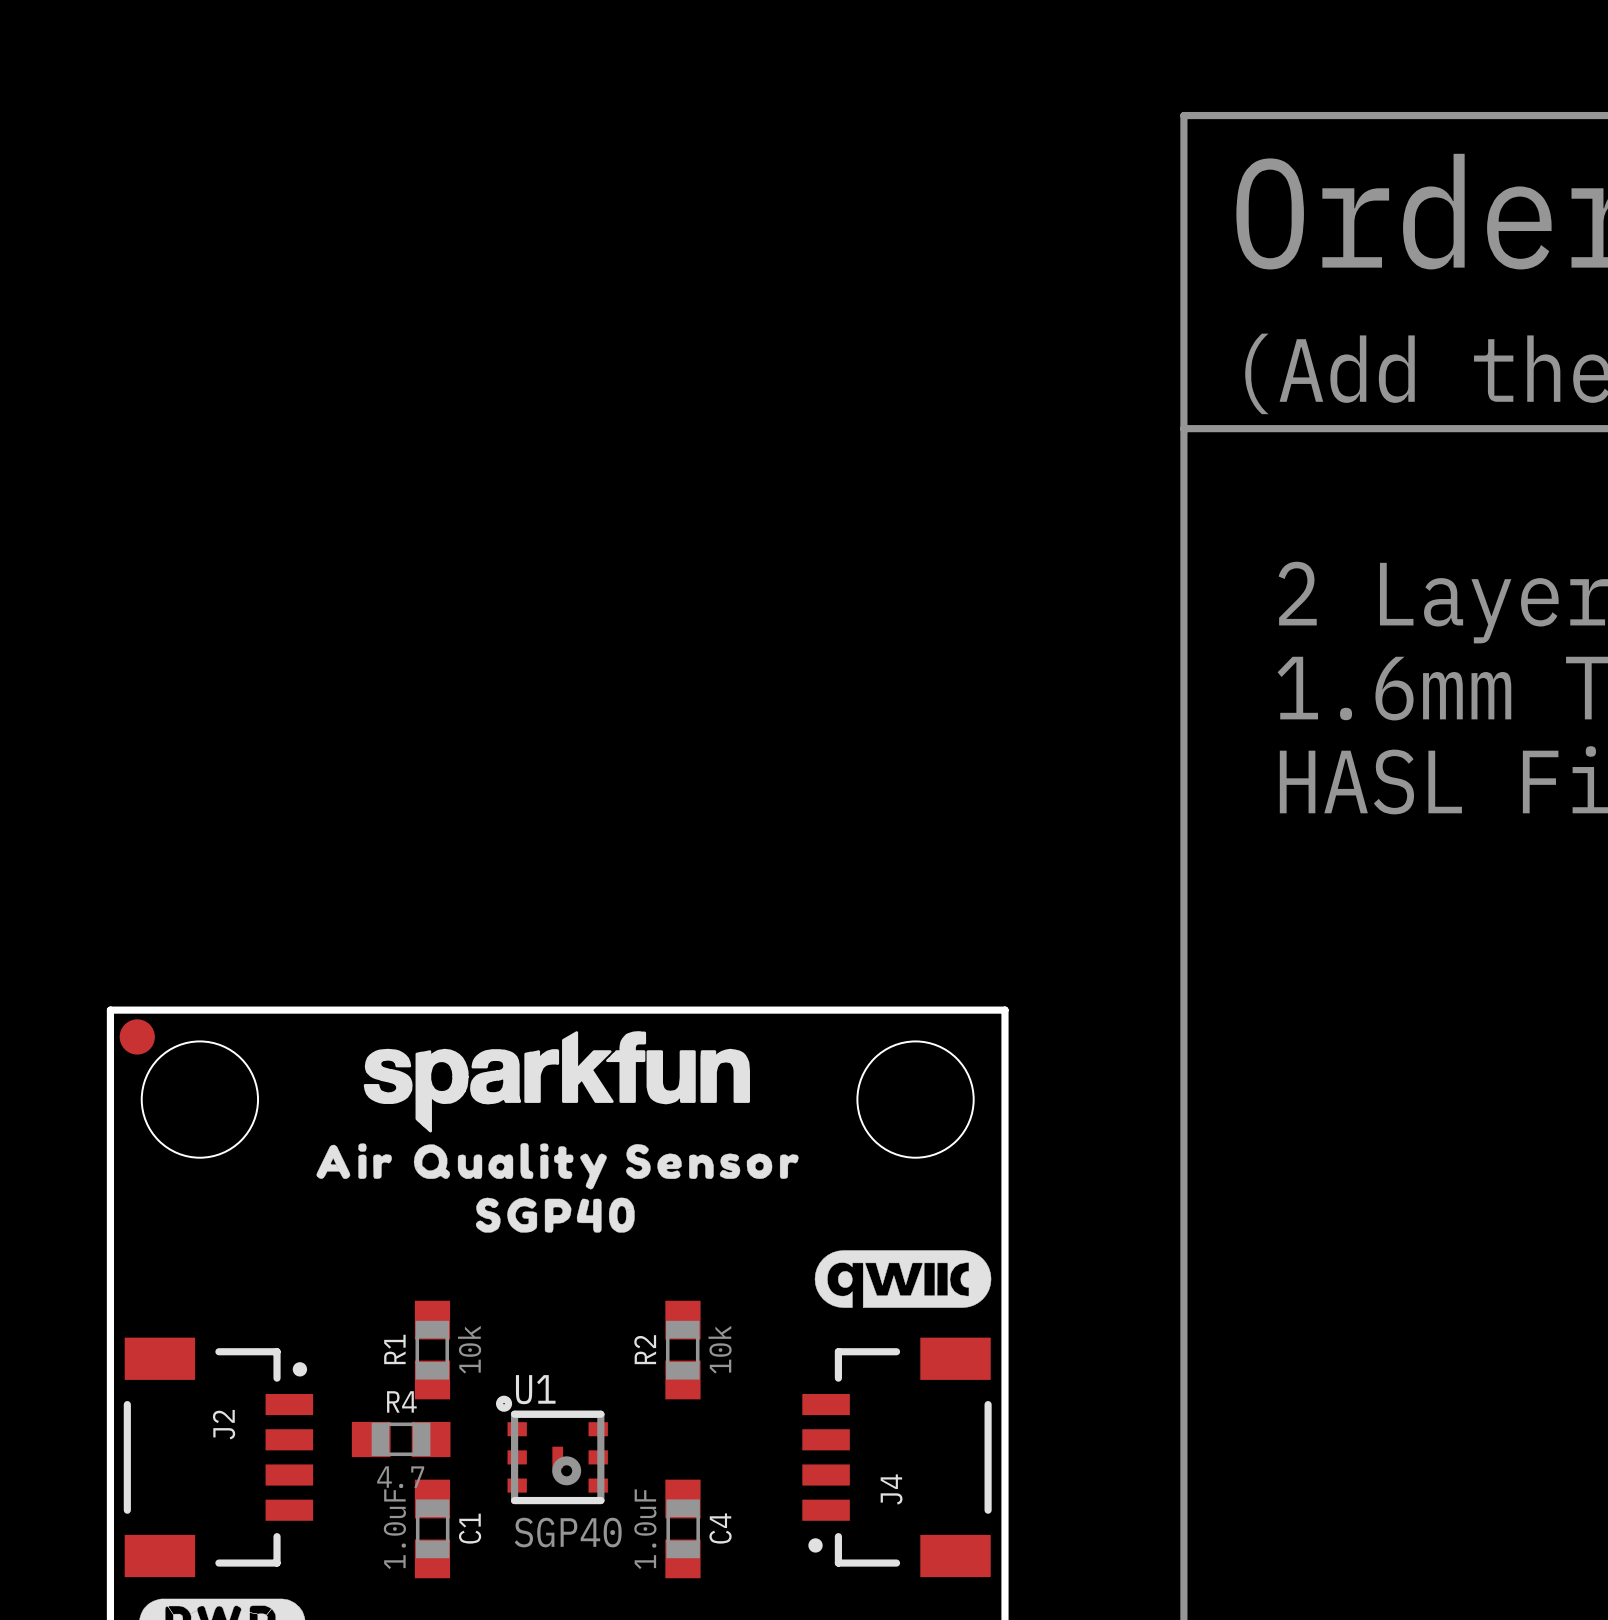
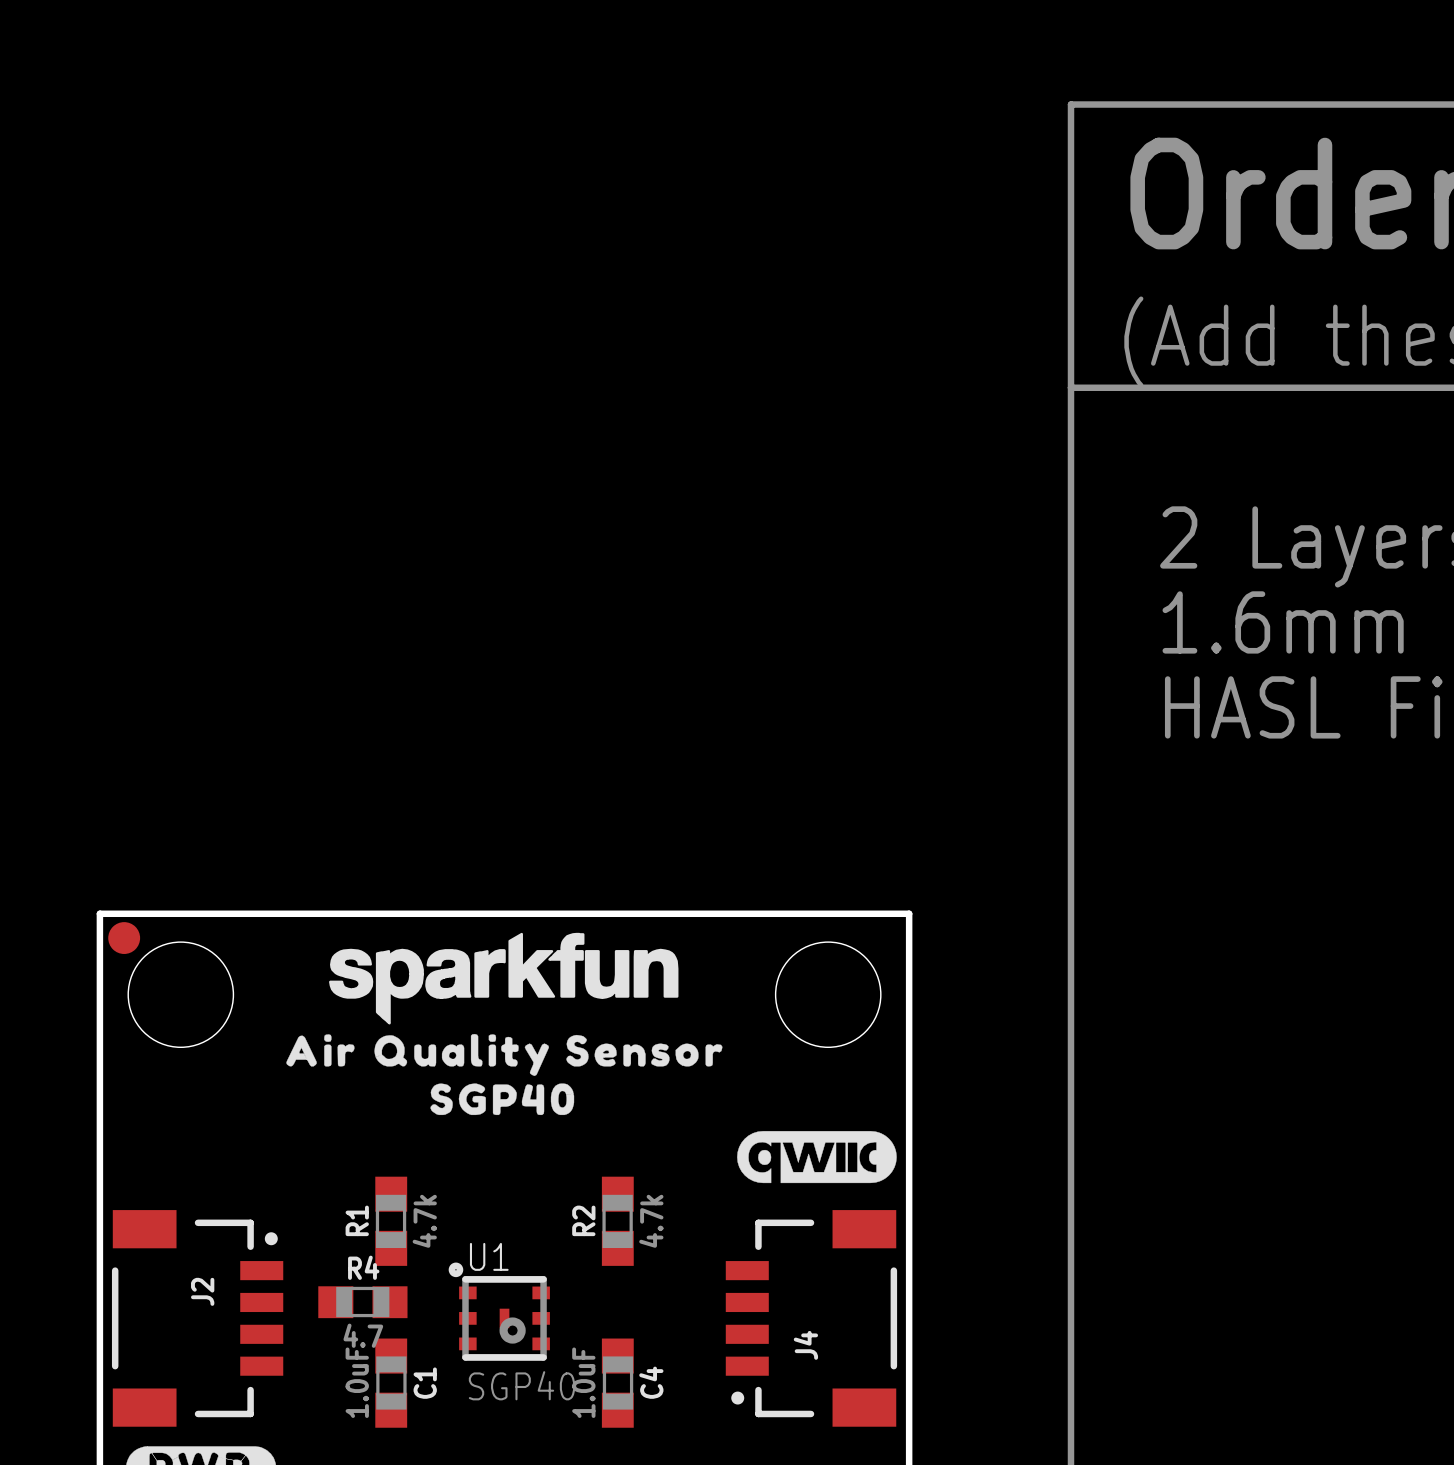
R1 value: 10k (469, 1349) -> 4.7k (424, 1221)
R2 value: 10k (720, 1349) -> 4.7k (651, 1221)

